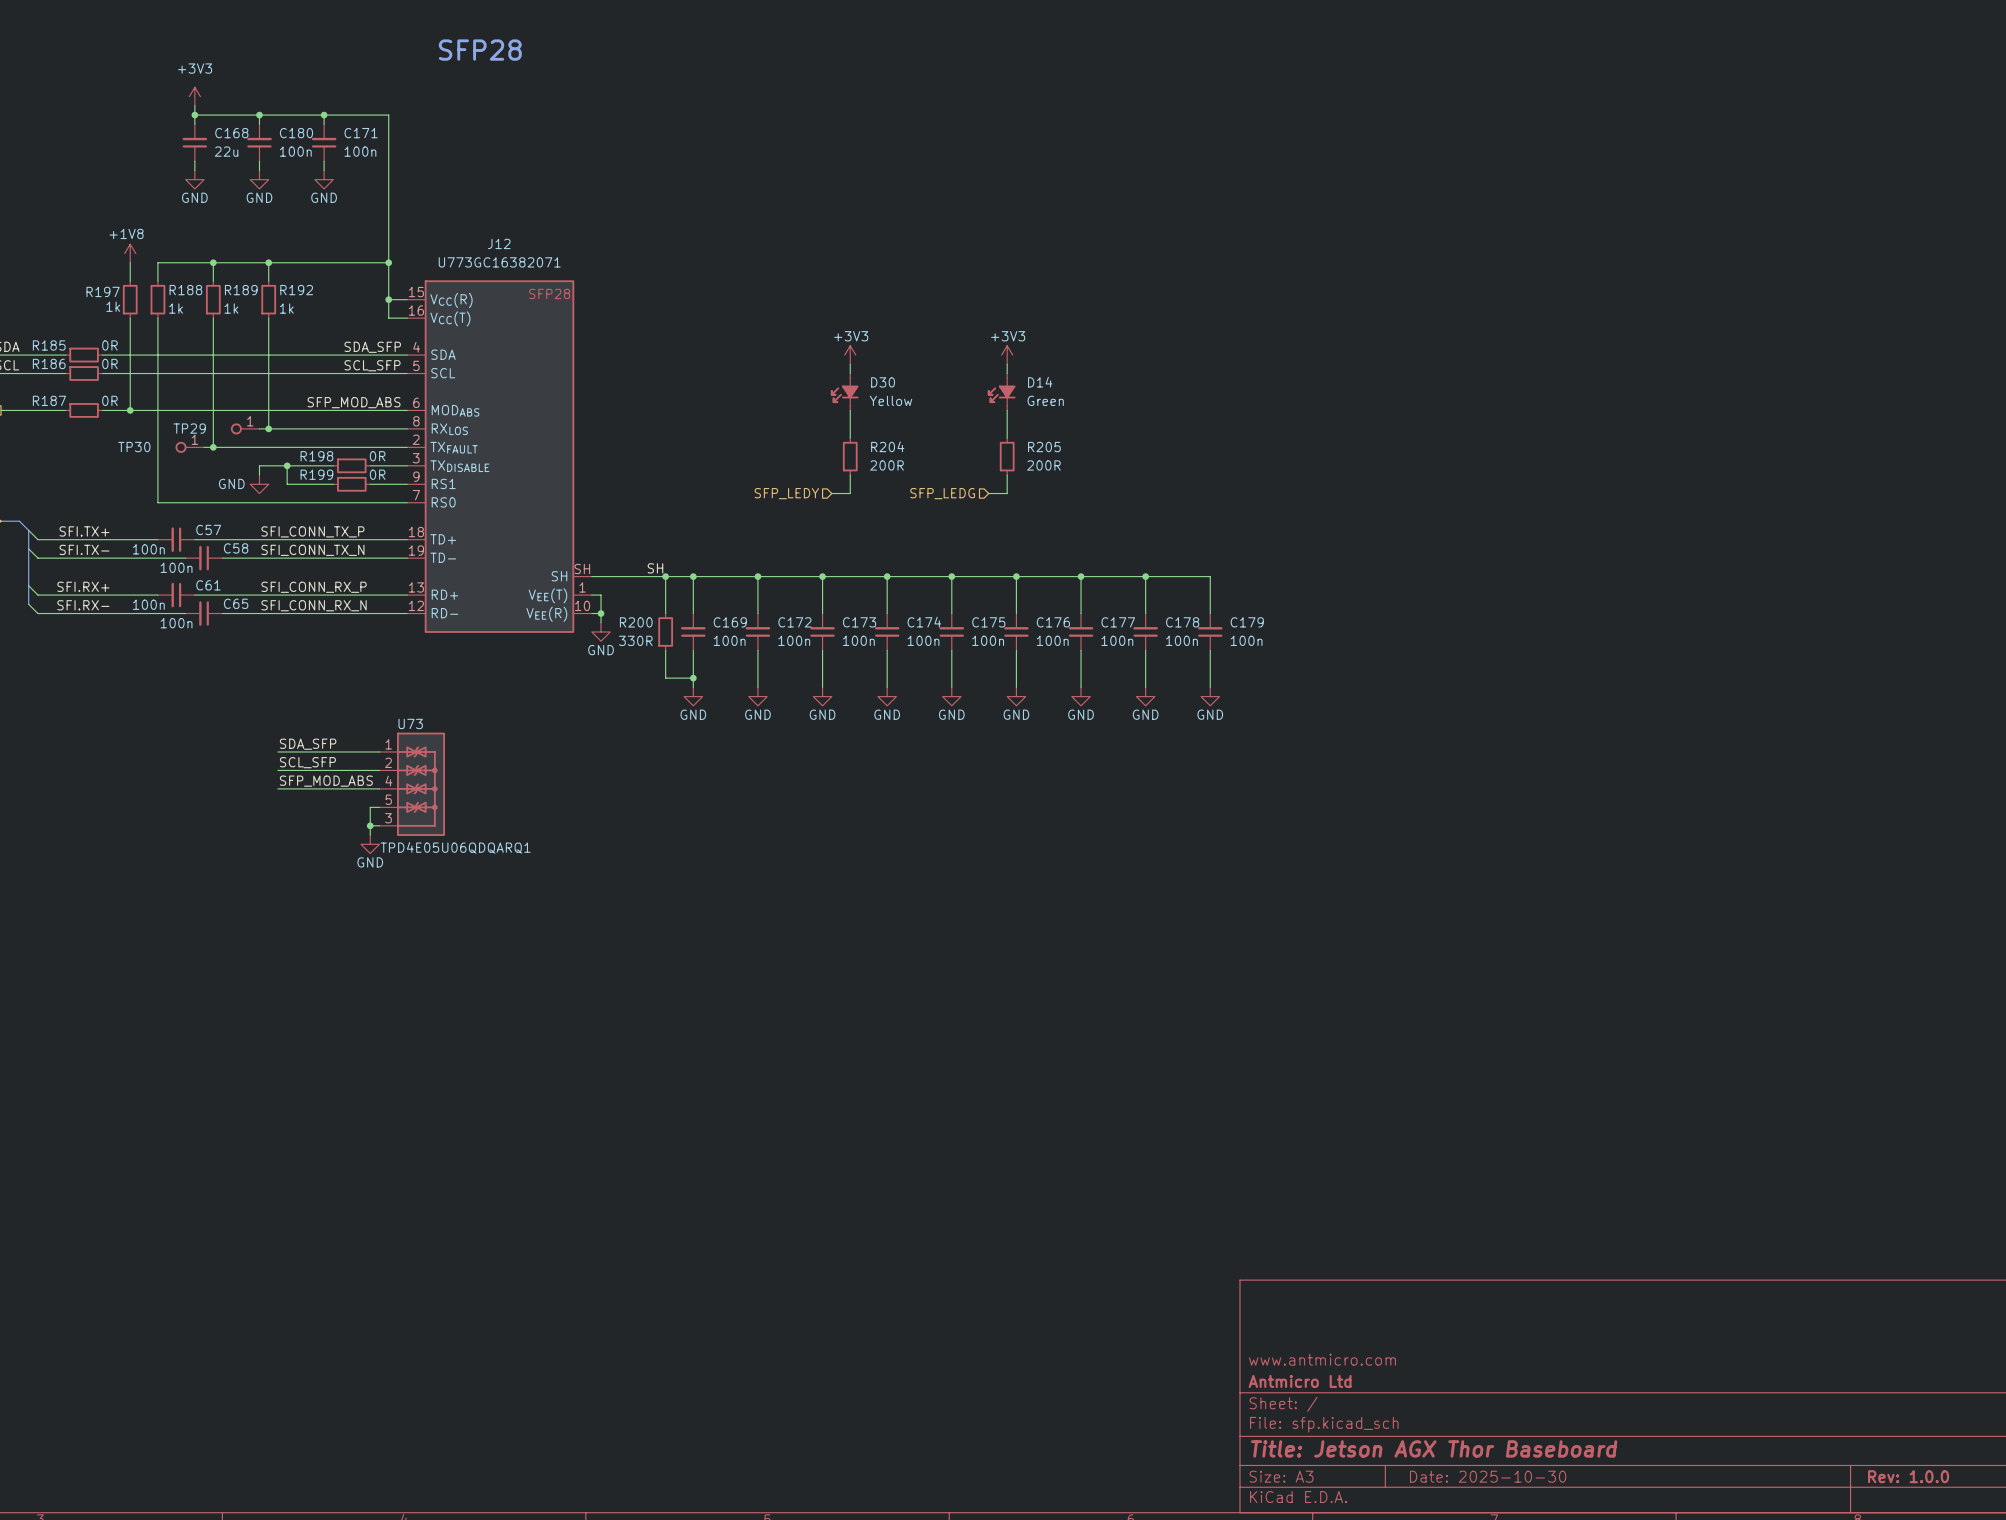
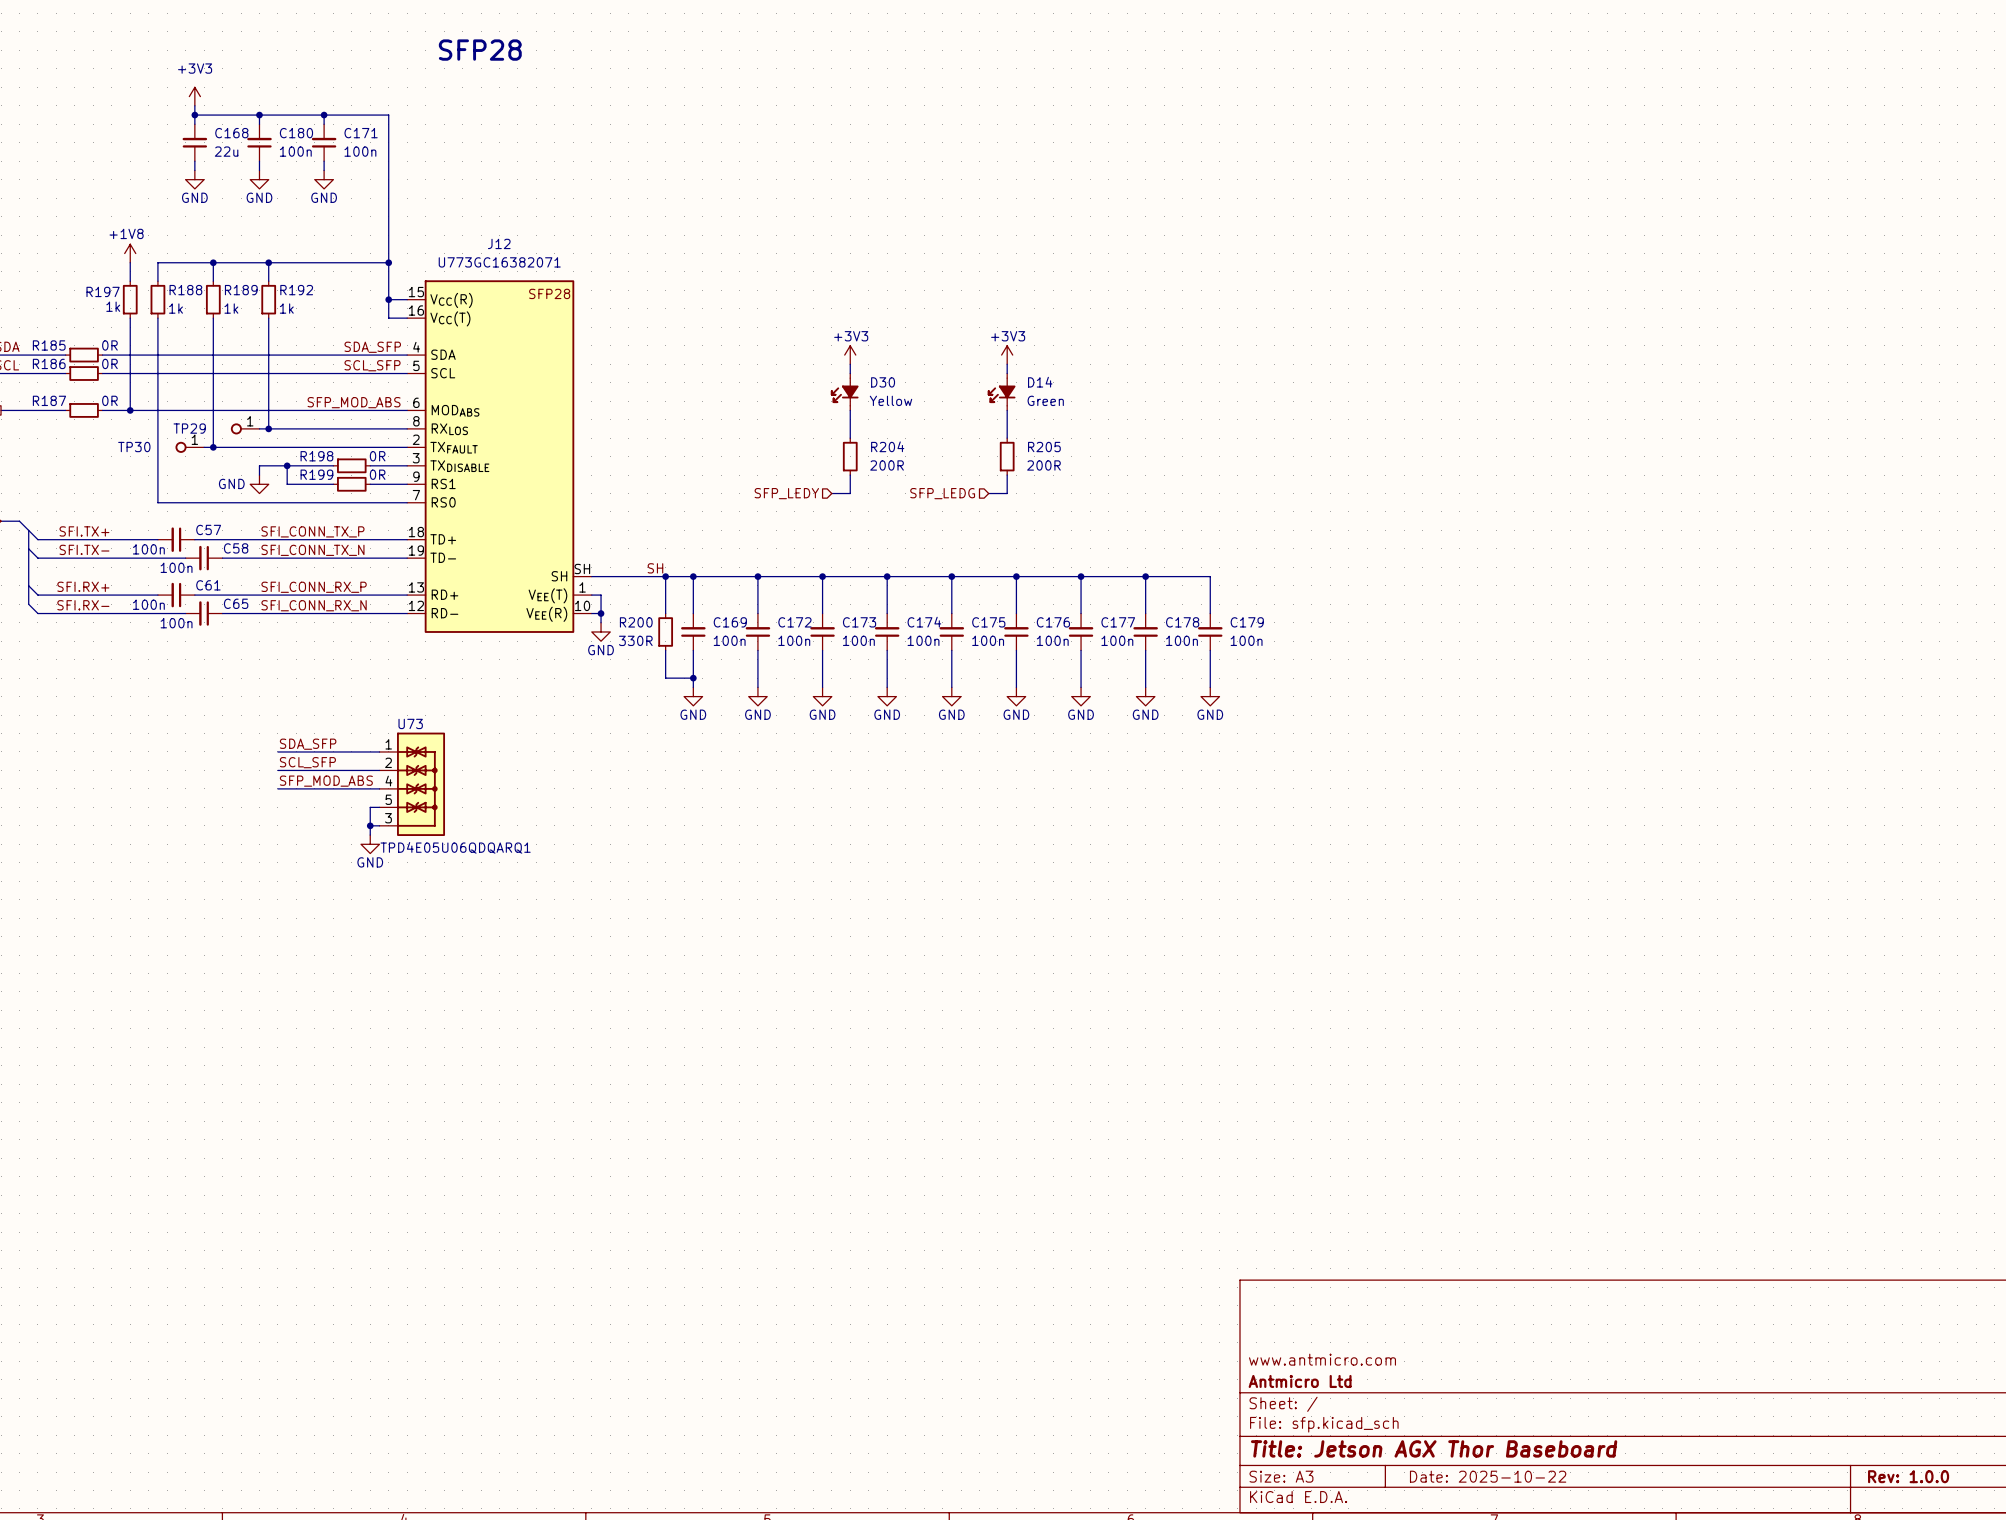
title block: Date: 2025-10-30 (1488, 1476) -> Date: 2025-10-22 (1488, 1476)

